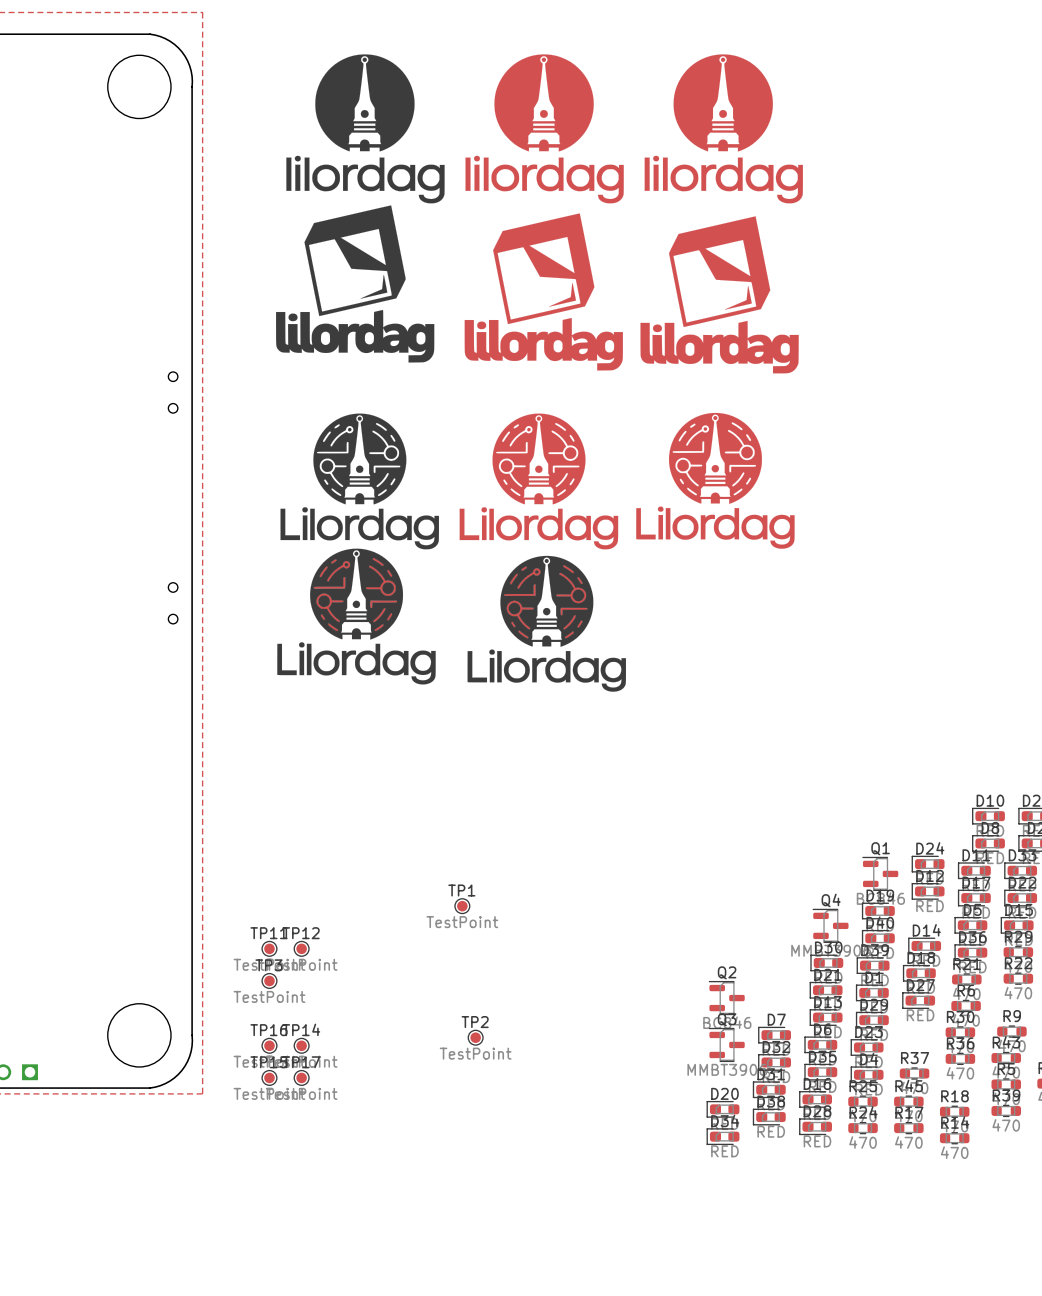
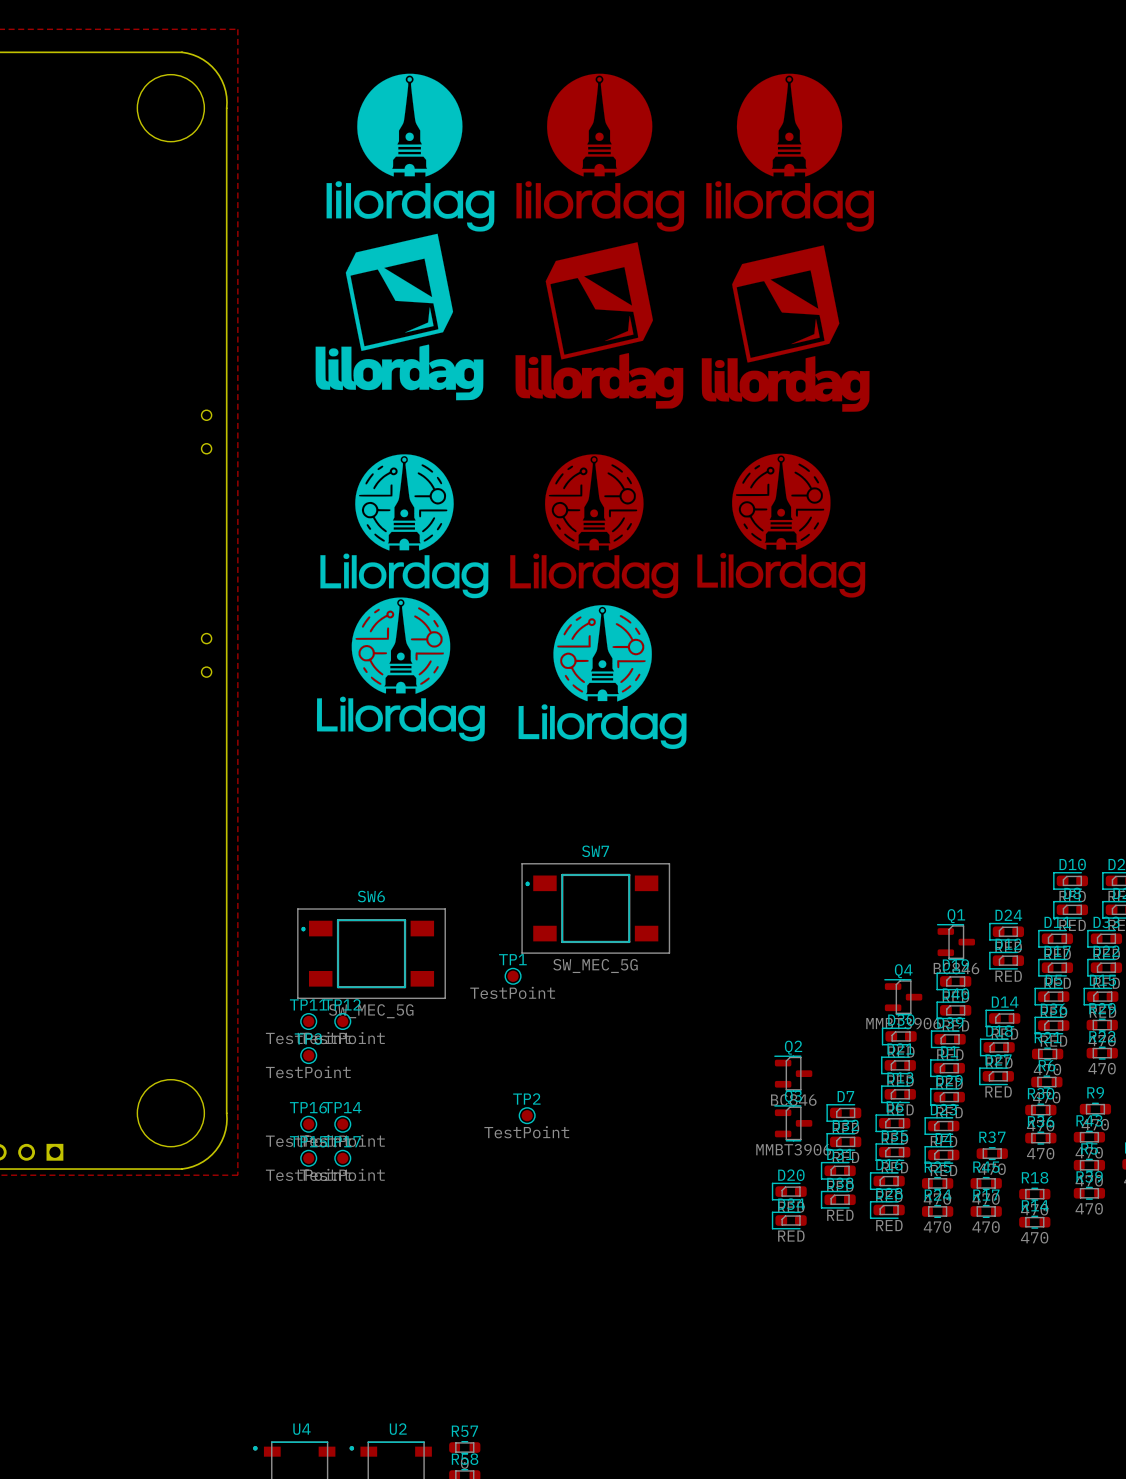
SW7: none -> SW_MEC_5G (595, 908)
SW6: none -> SW_MEC_5G (371, 953)

